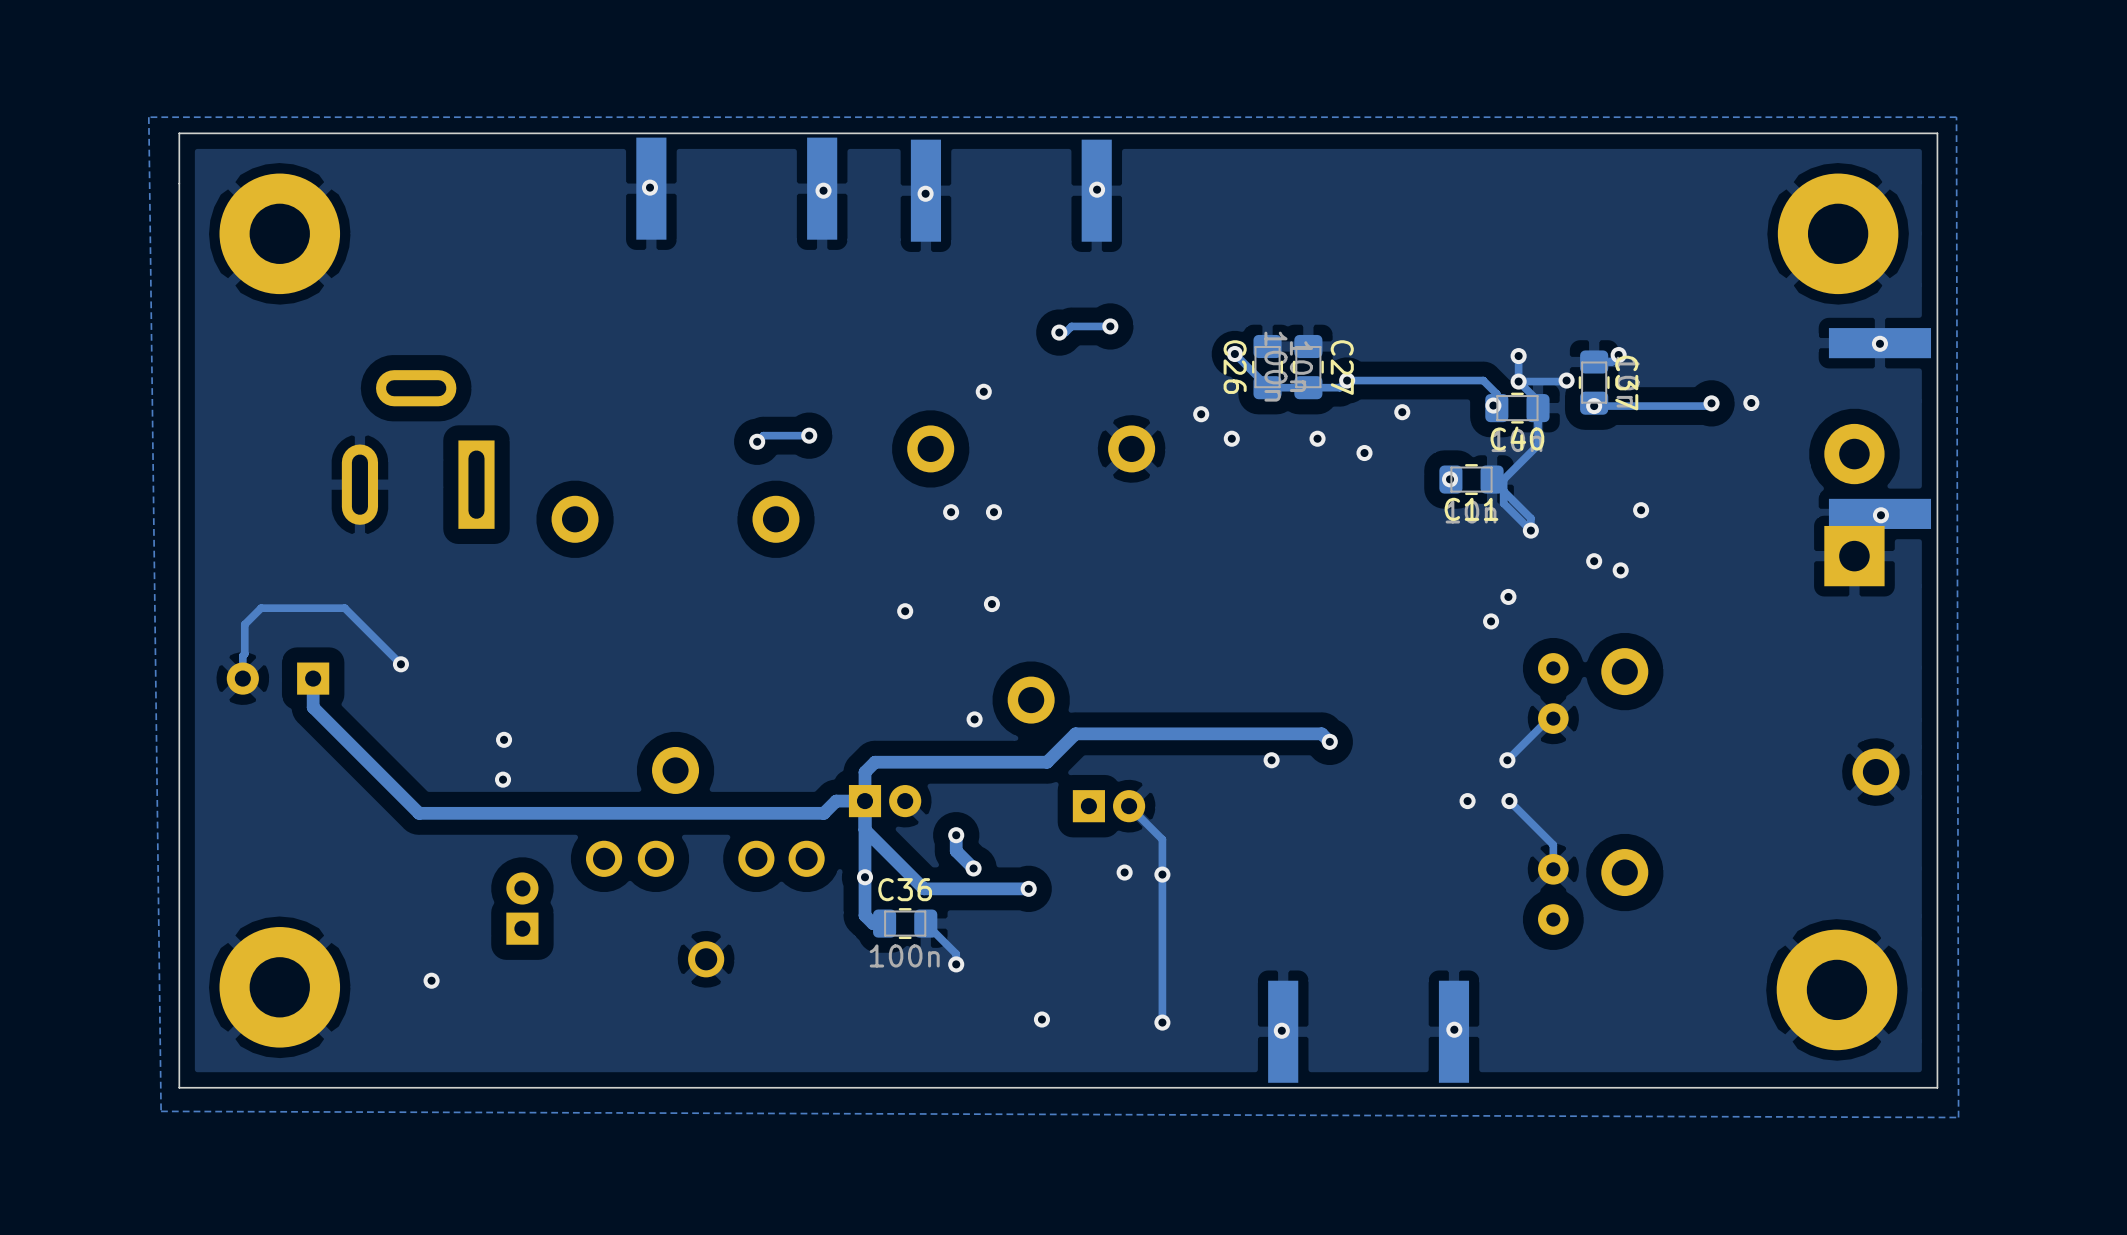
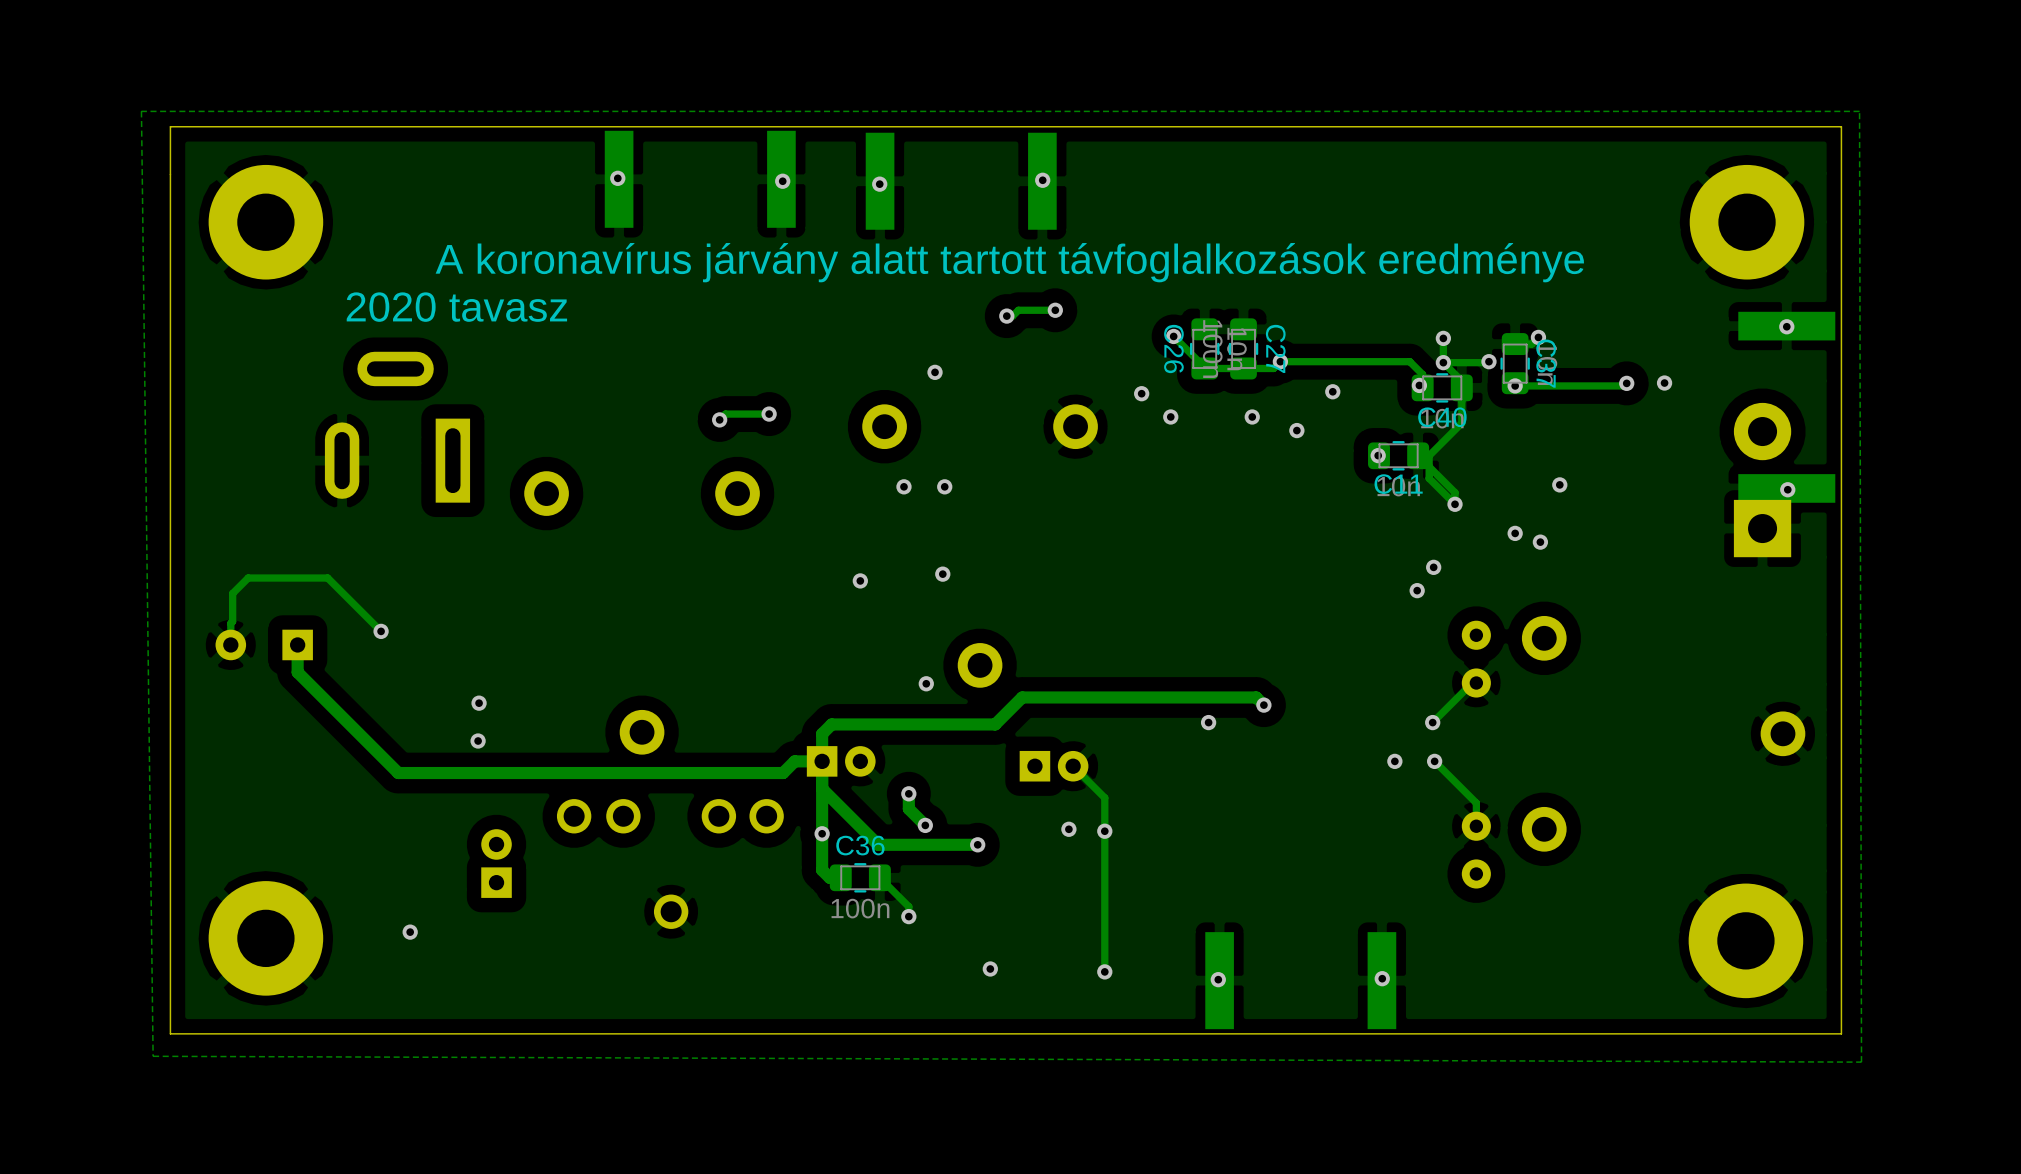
text: none -> A koronavírus járvány alatt tartott távfoglalkozások eredménye (1009, 262)
text: none -> 2020 tavasz (456, 307)

